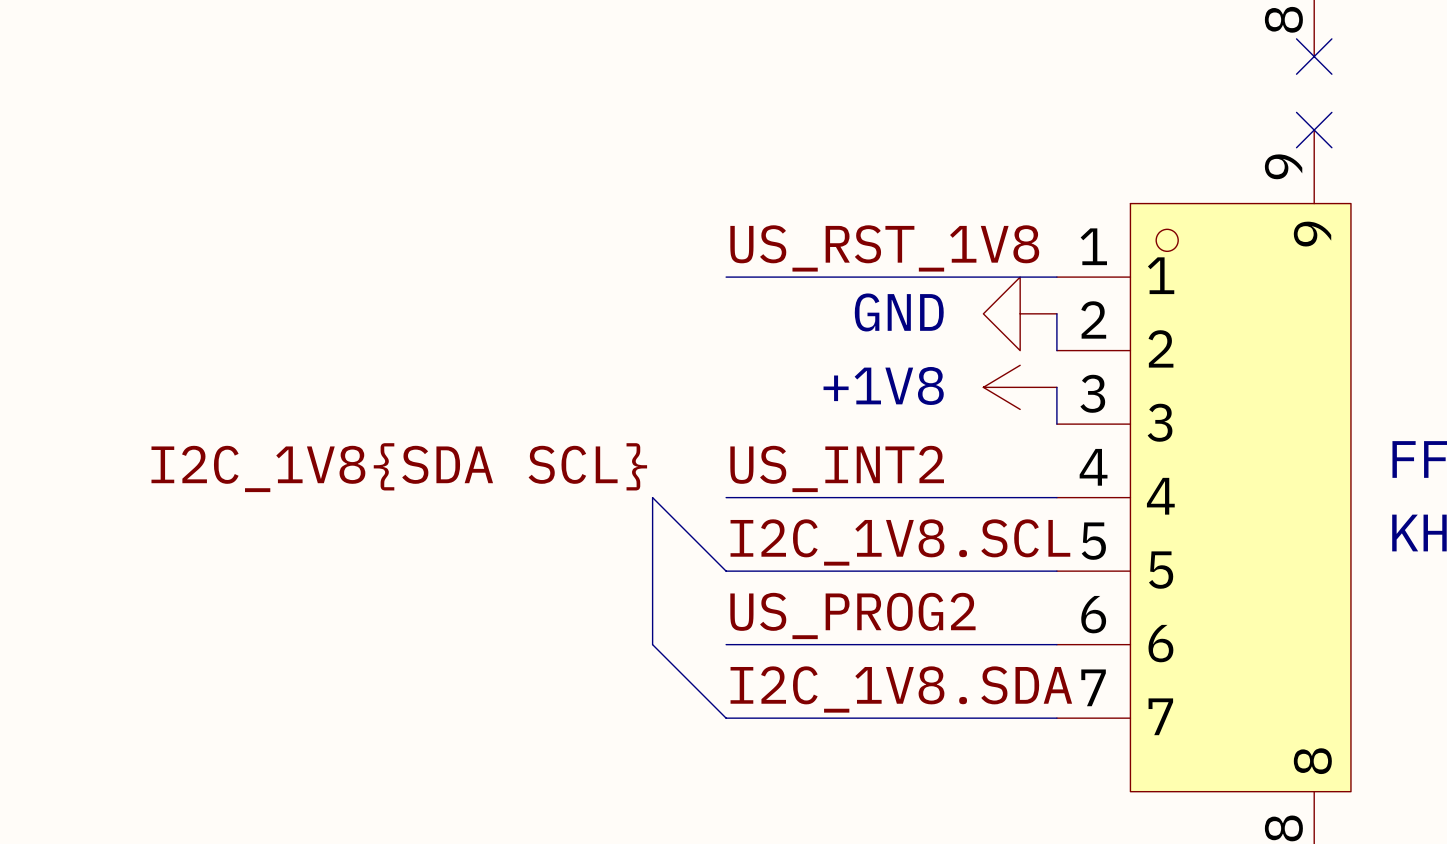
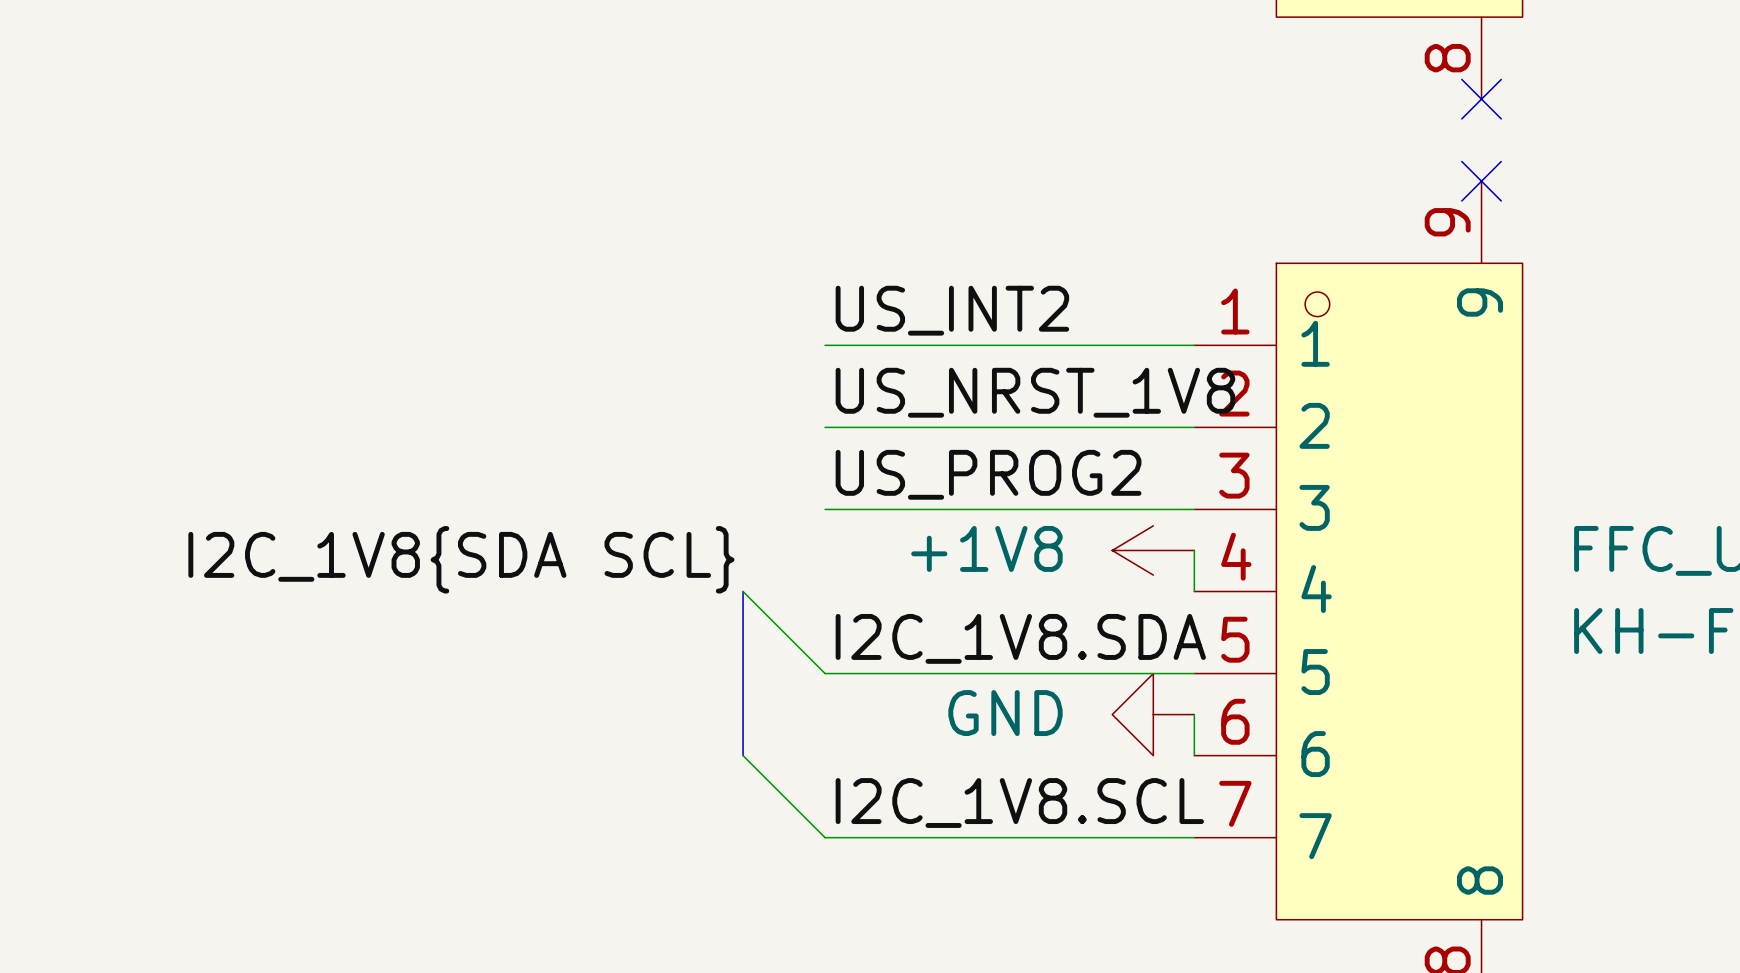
label: US_RST_1V8 (884, 248) -> US_INT2 (952, 310)
power symbol position: GND (1020, 313) -> GND (1153, 714)
wire: (1056, 313) (1056, 350) -> (825, 427) (1194, 427)
label: none -> US_NRST_1V8 (1035, 392)
power symbol position: +1V8 (1020, 387) -> +1V8 (1153, 550)
wire: (1056, 387) (1056, 424) -> (825, 509) (1194, 509)
label: US_INT2 (837, 468) -> none
wire: (726, 497) (1056, 497) -> (1194, 550) (1194, 591)
label: I2C_1V8.SCL (900, 542) -> I2C_1V8.SDA (1020, 638)
label position: US_PROG2 (852, 615) -> US_PROG2 (988, 474)
wire: (726, 644) (1056, 644) -> (1194, 714) (1194, 755)
label: I2C_1V8.SDA (901, 689) -> I2C_1V8.SCL (1019, 803)

